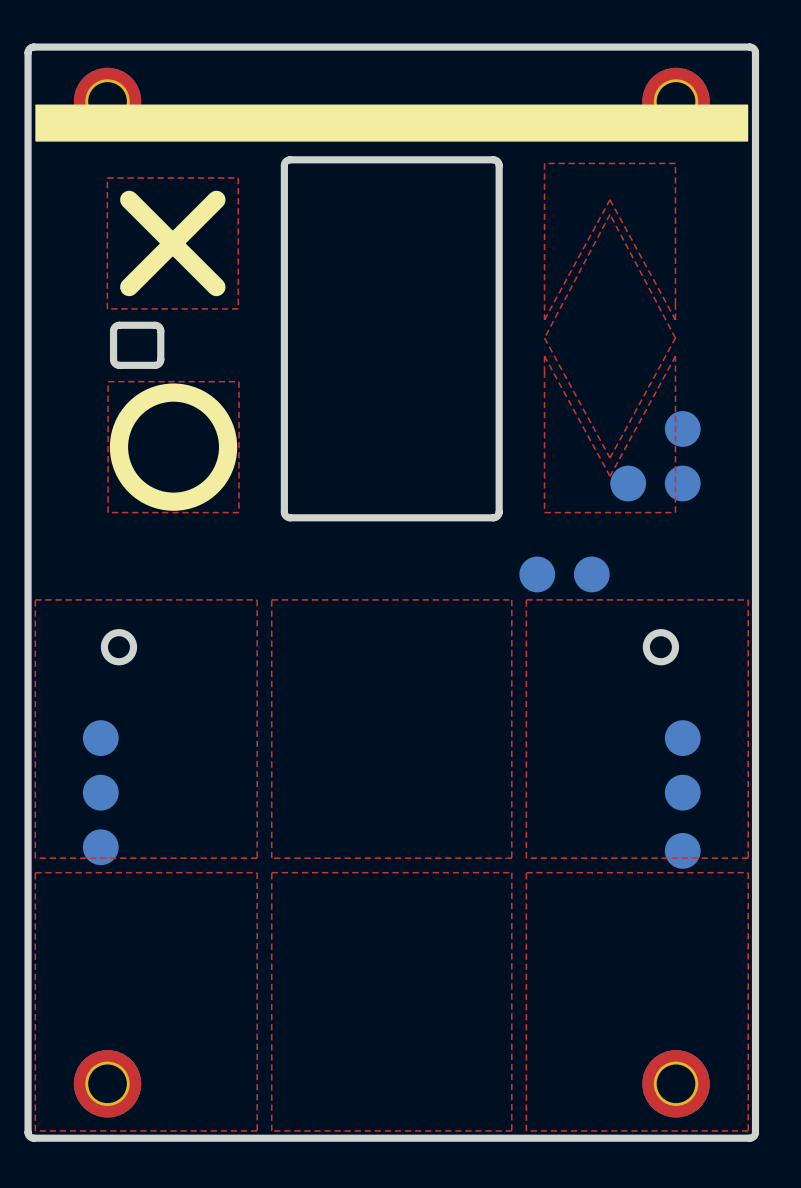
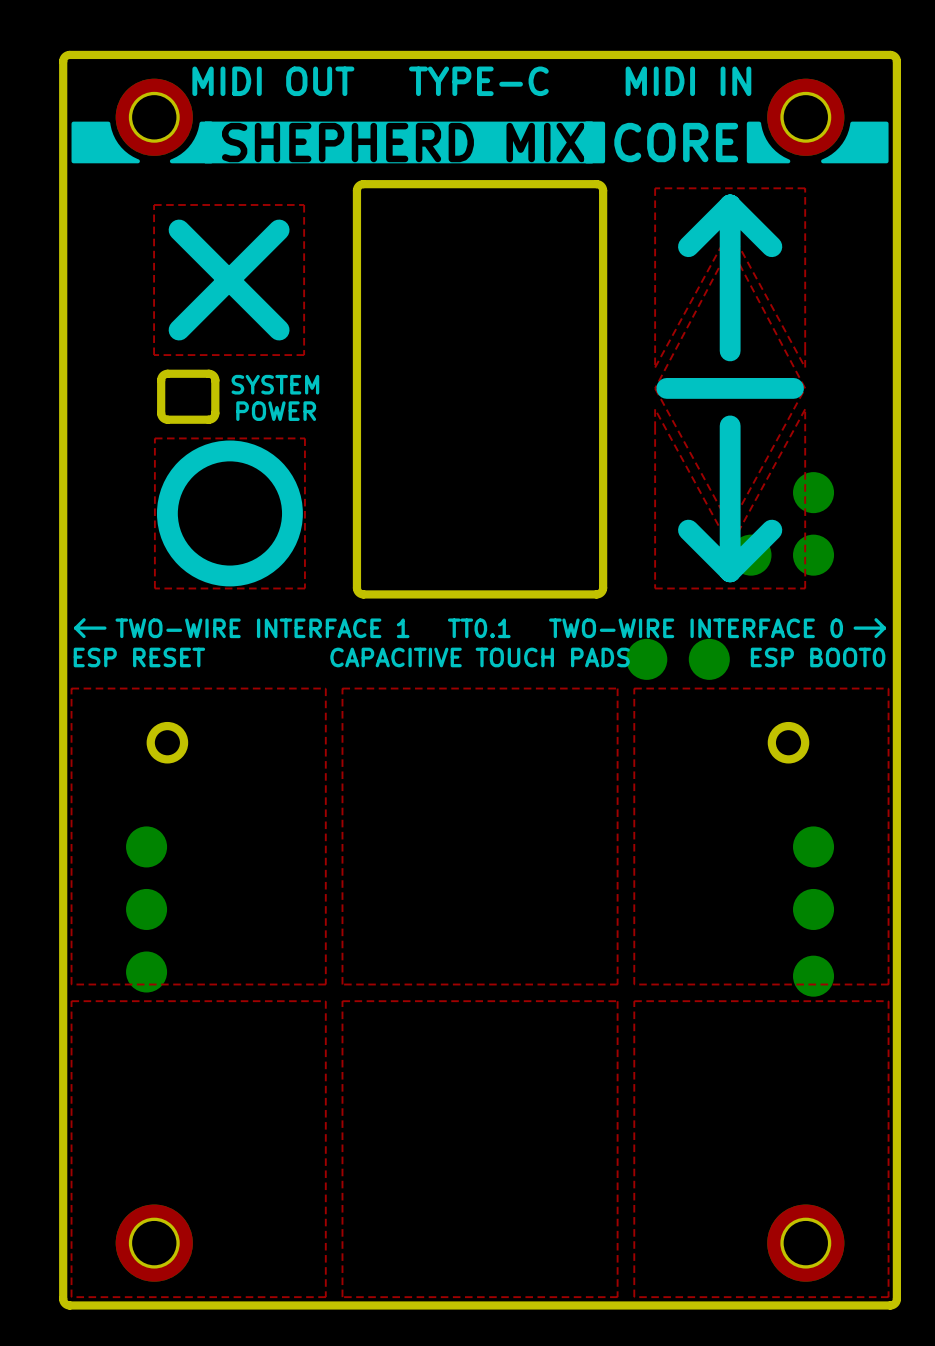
text: none -> MIDI OUT (273, 81)
text: none -> TYPE-C (478, 81)
text: none -> MIDI IN (688, 81)
drawing: [35, 104, 749, 142] -> none
drawing: none -> [71, 121, 140, 164]
drawing: none -> [169, 121, 791, 164]
drawing: none -> [821, 121, 889, 164]
line: none -> (730, 204) (688, 246)
line: none -> (730, 204) (730, 350)
line: none -> (730, 204) (771, 246)
text: none -> SYSTEM (275, 384)
line: none -> (666, 388) (793, 388)
text: none -> POWER (276, 411)
line: none -> (730, 425) (730, 571)
line: none -> (688, 530) (730, 571)
line: none -> (771, 530) (730, 571)
line: none -> (84, 619) (75, 628)
line: none -> (876, 619) (884, 628)
line: none -> (75, 628) (104, 628)
line: none -> (75, 628) (84, 636)
text: none -> TWO-WIRE INTERFACE 1 (262, 628)
text: none -> TT0.1 (479, 628)
text: none -> TWO-WIRE INTERFACE 0 (696, 628)
line: none -> (855, 628) (884, 628)
line: none -> (884, 628) (876, 636)
text: none -> ESP RESET (139, 657)
text: none -> CAPACITIVE TOUCH PADS (480, 657)
text: none -> ESP BOOT0 (818, 657)

